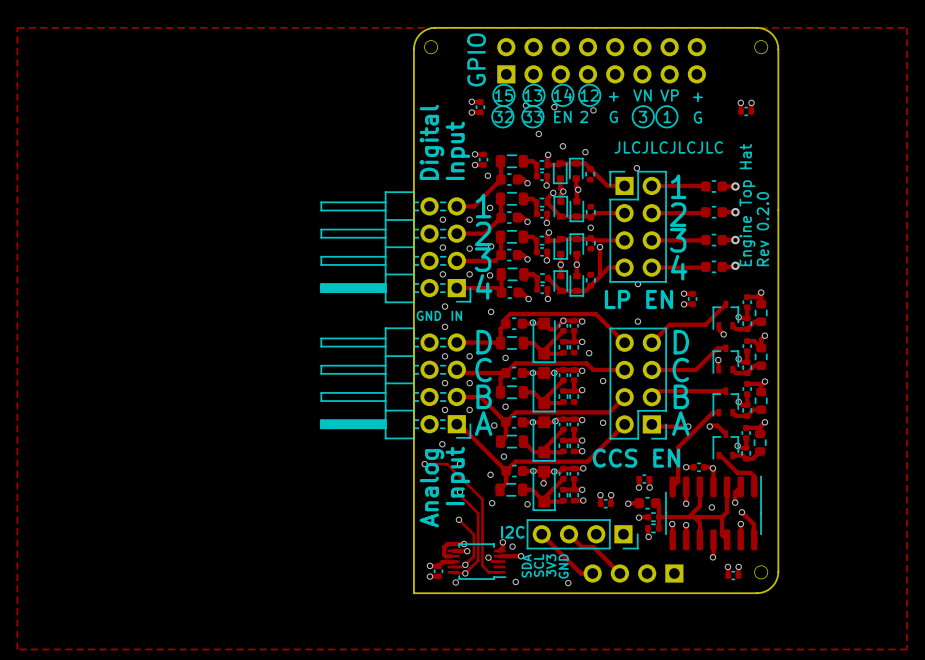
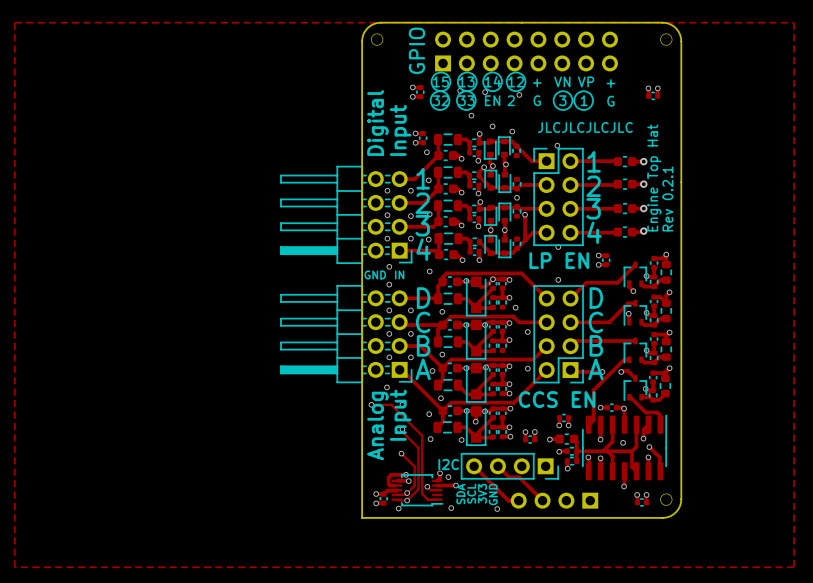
text: Rev 0.2.0 (762, 229) -> Rev 0.2.1 (667, 198)

